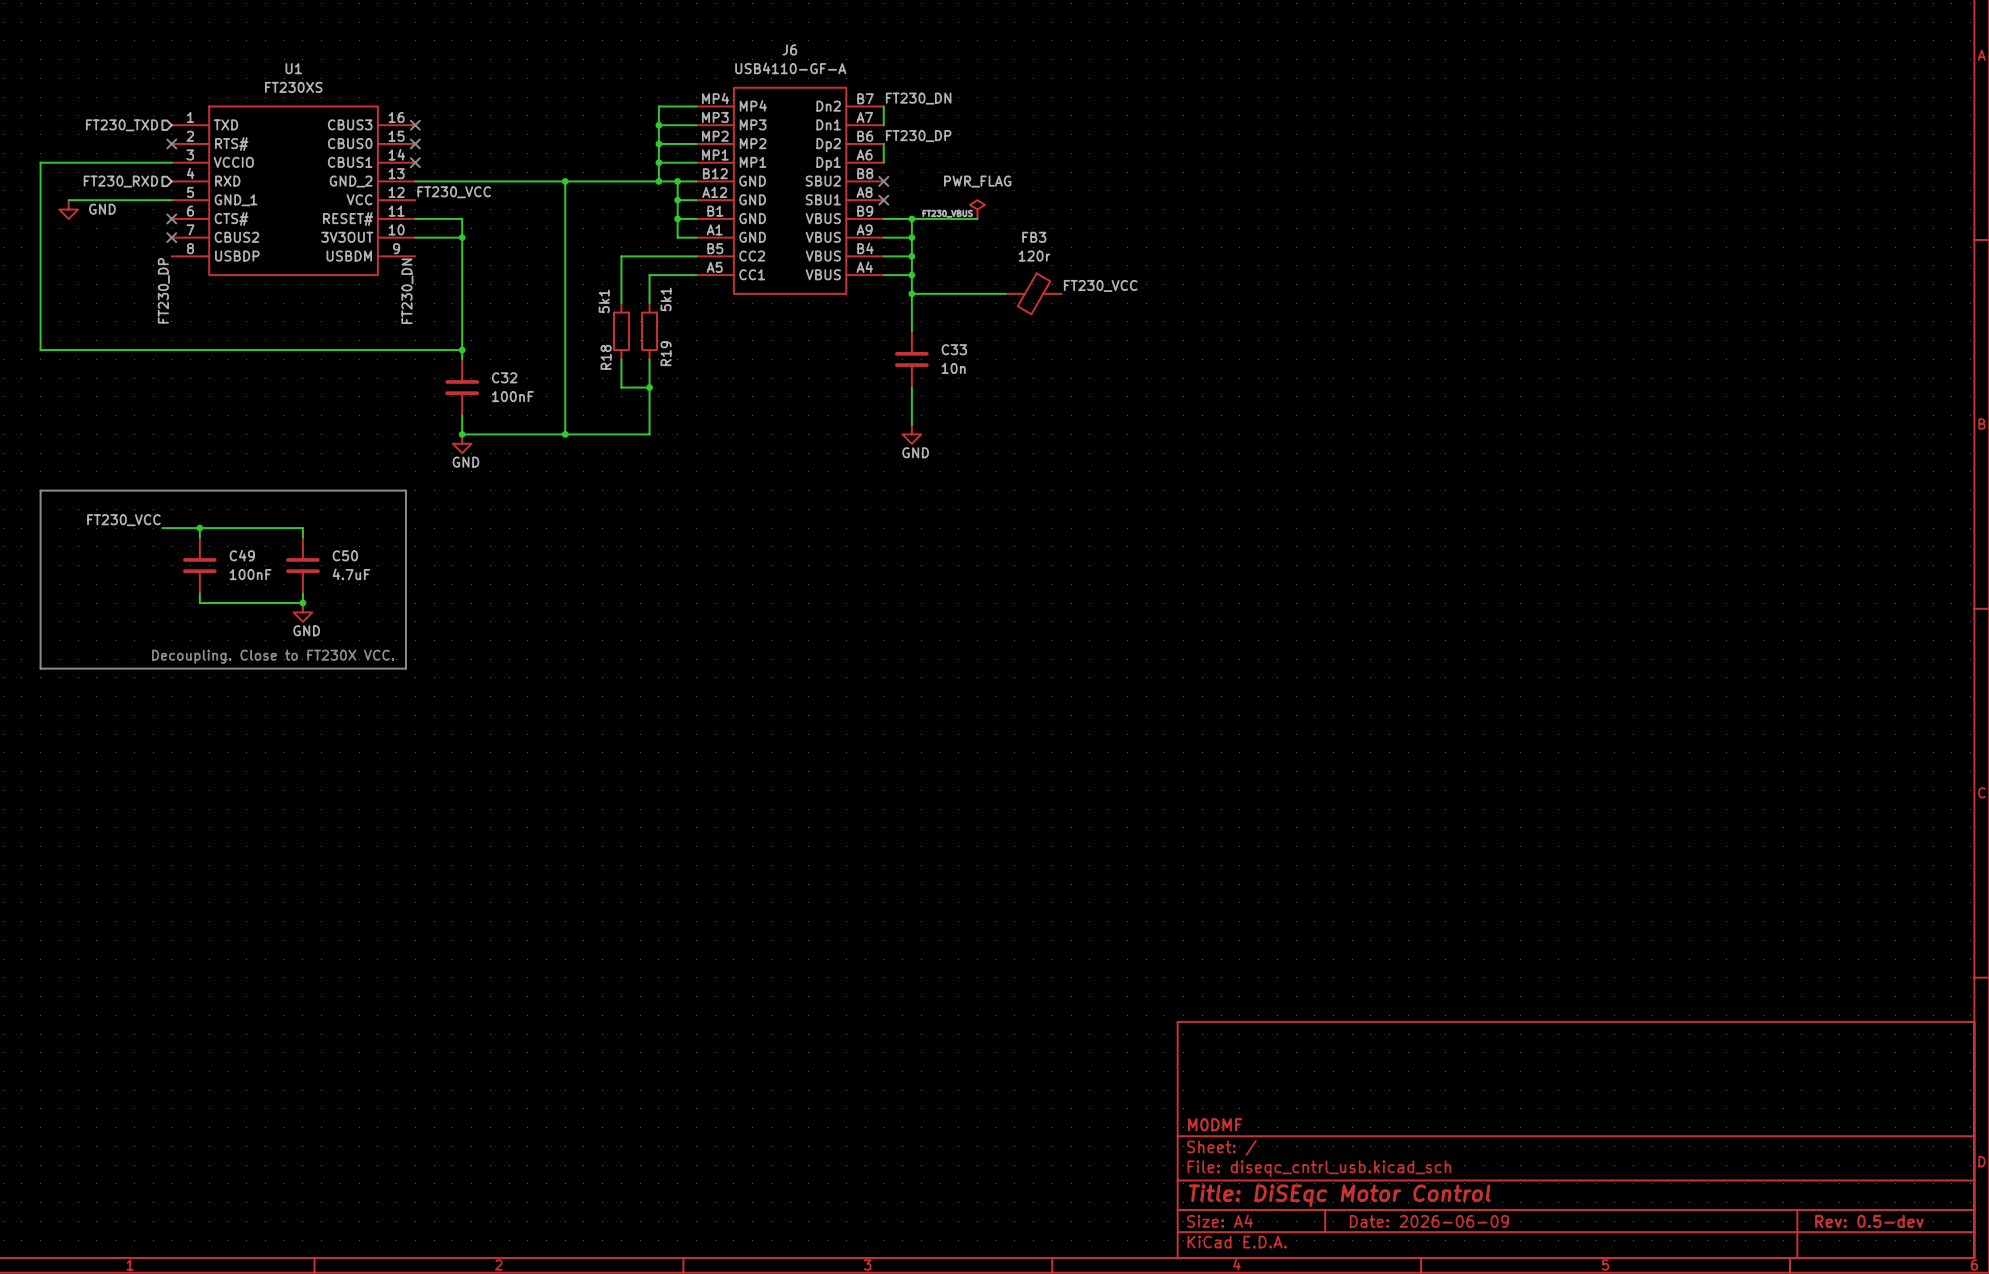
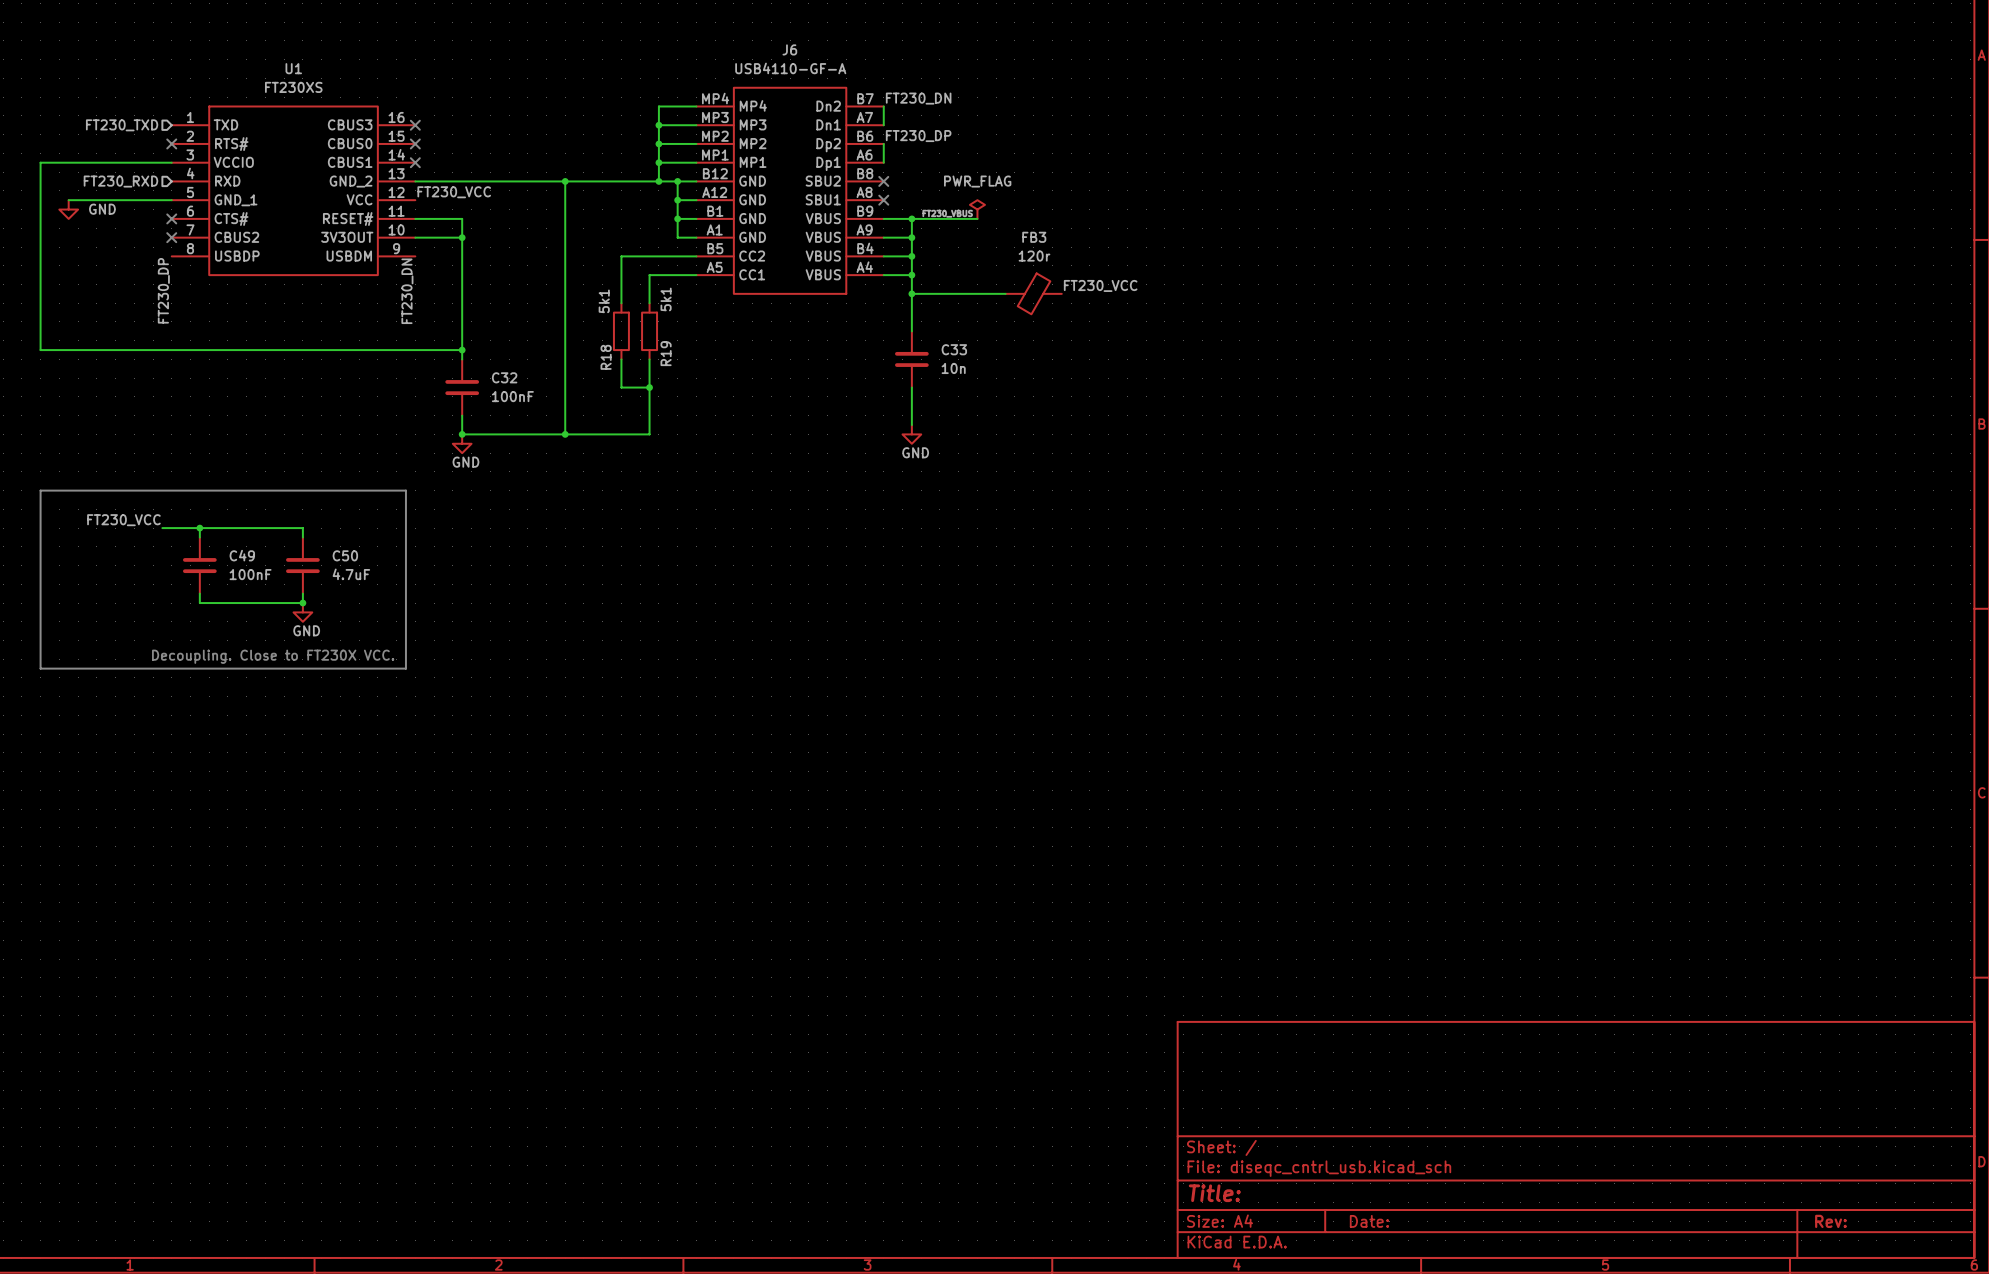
title block: M0DMF (1215, 1124) -> none
title block: Title: DiSEqc Motor Control (1339, 1195) -> Title: (1214, 1193)
title block: Date: 2026-06-09 (1429, 1221) -> Date: (1369, 1221)
title block: Rev: 0.5-dev (1869, 1221) -> Rev: (1830, 1221)

